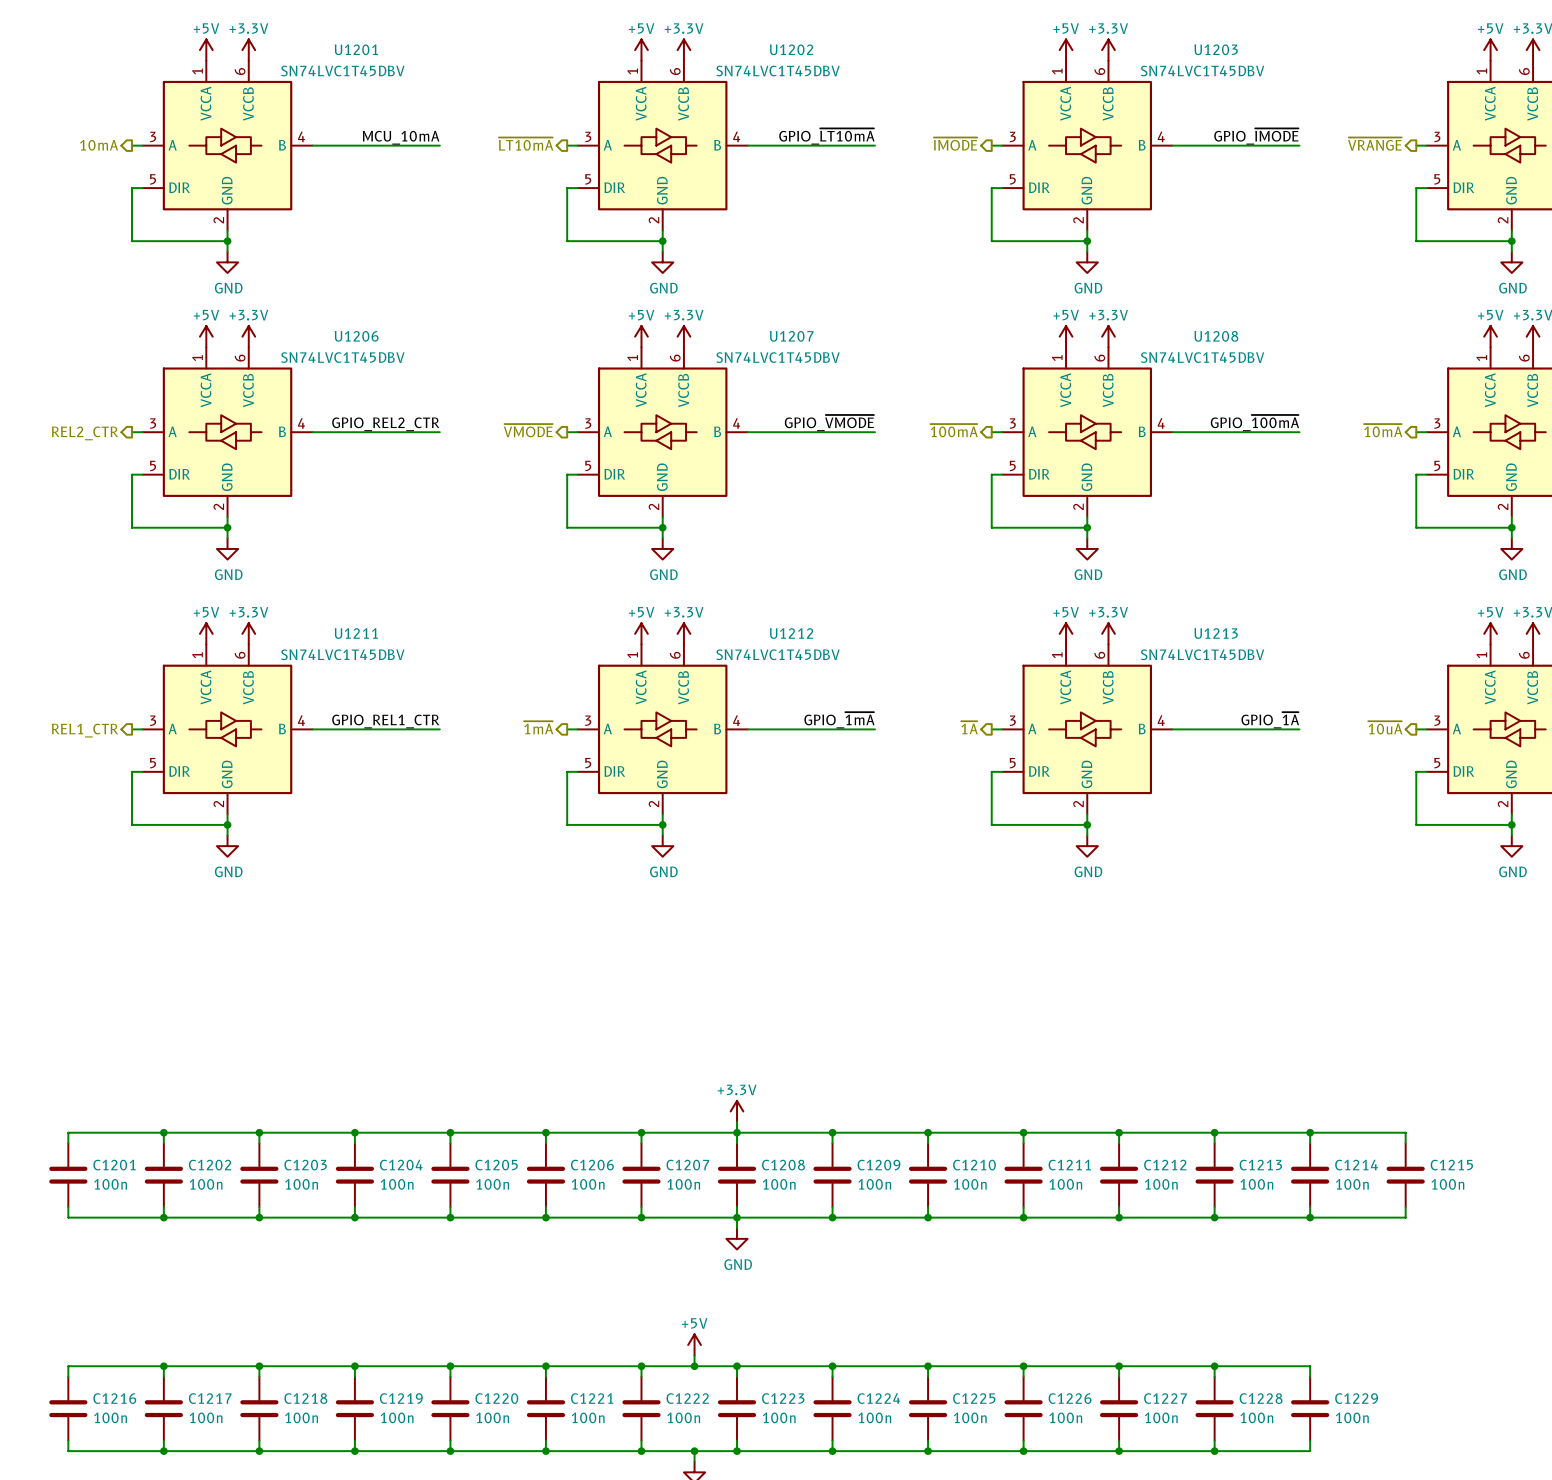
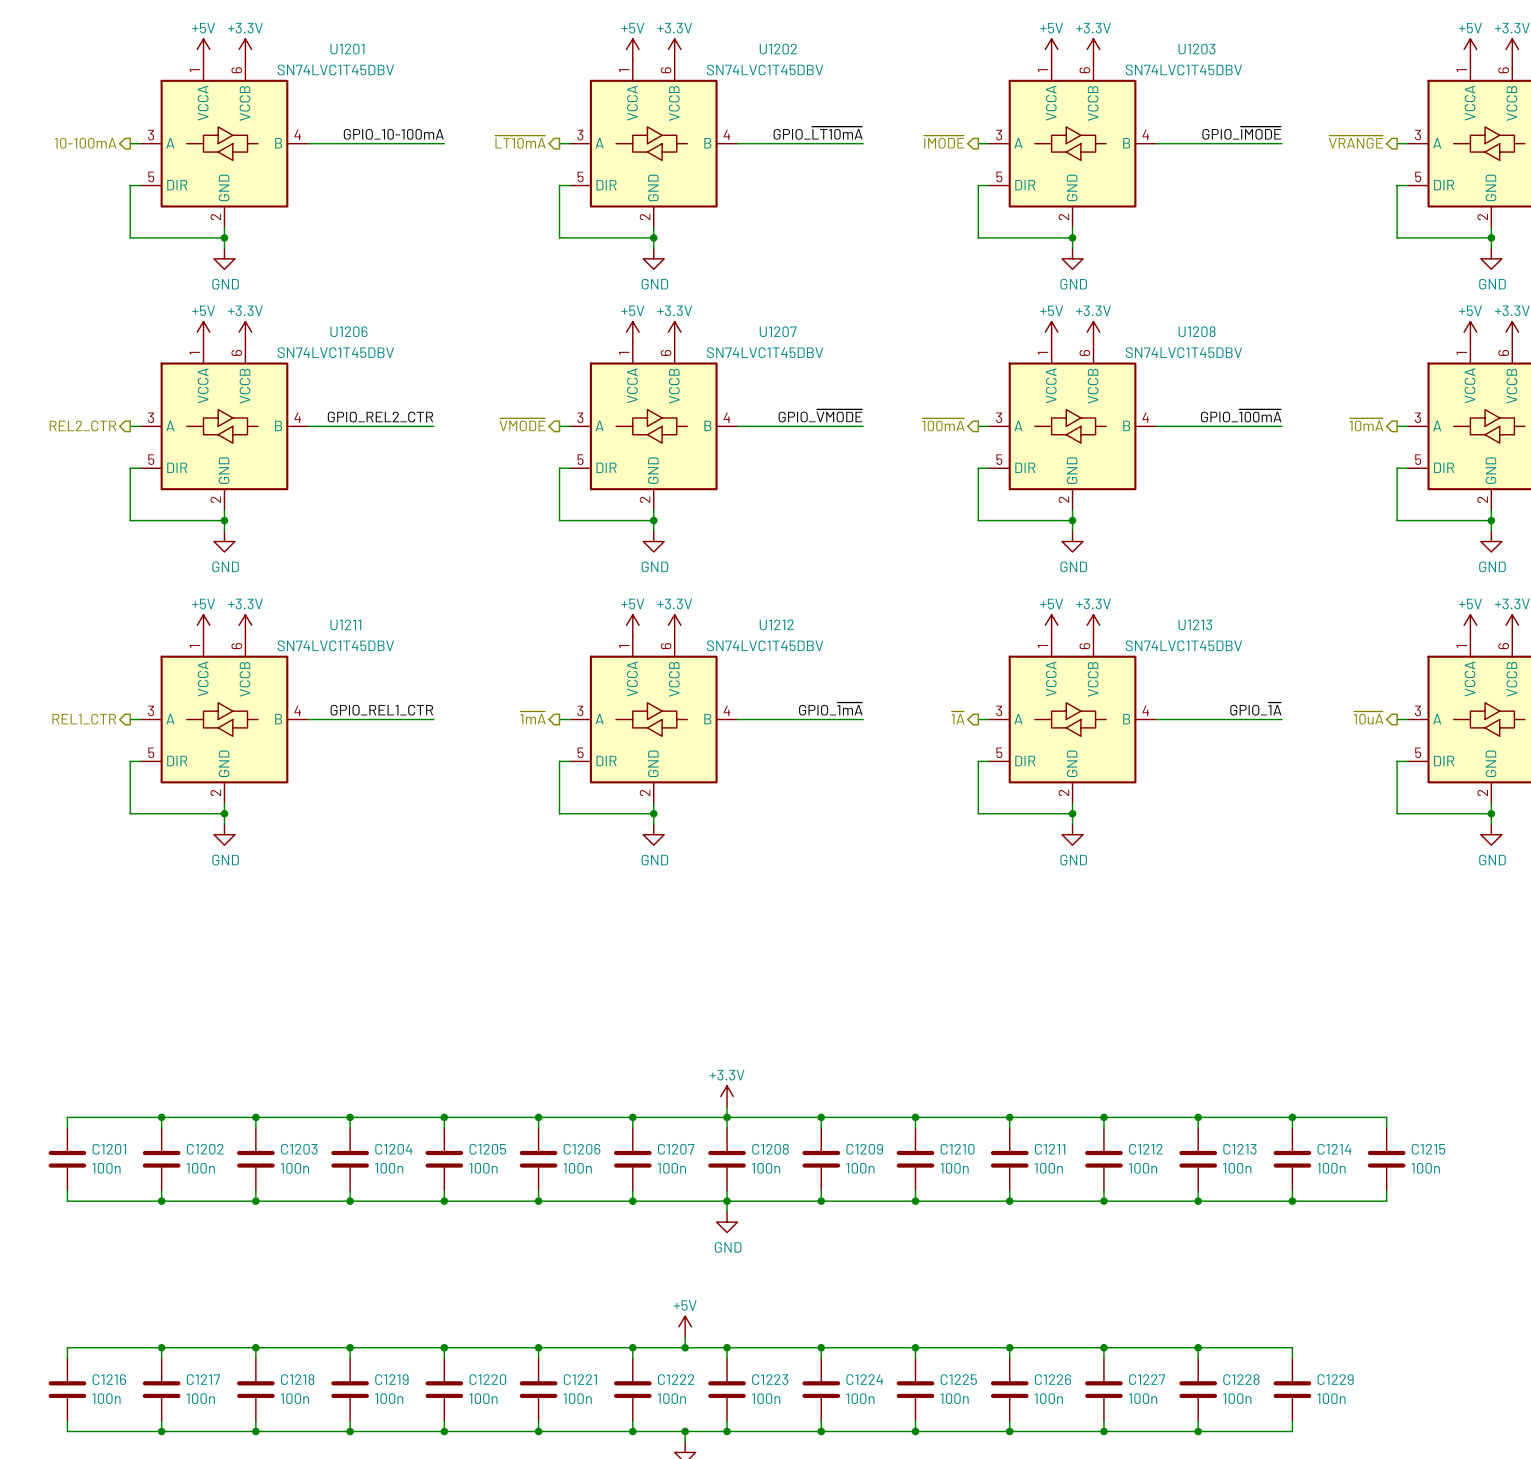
label: none -> GPIO_10-100mA (393, 134)
label: MCU_10mA (401, 137) -> none
hierarchical label: 10mA (99, 145) -> 10-100mA (85, 143)
wire: none -> (433, 143) (444, 143)

